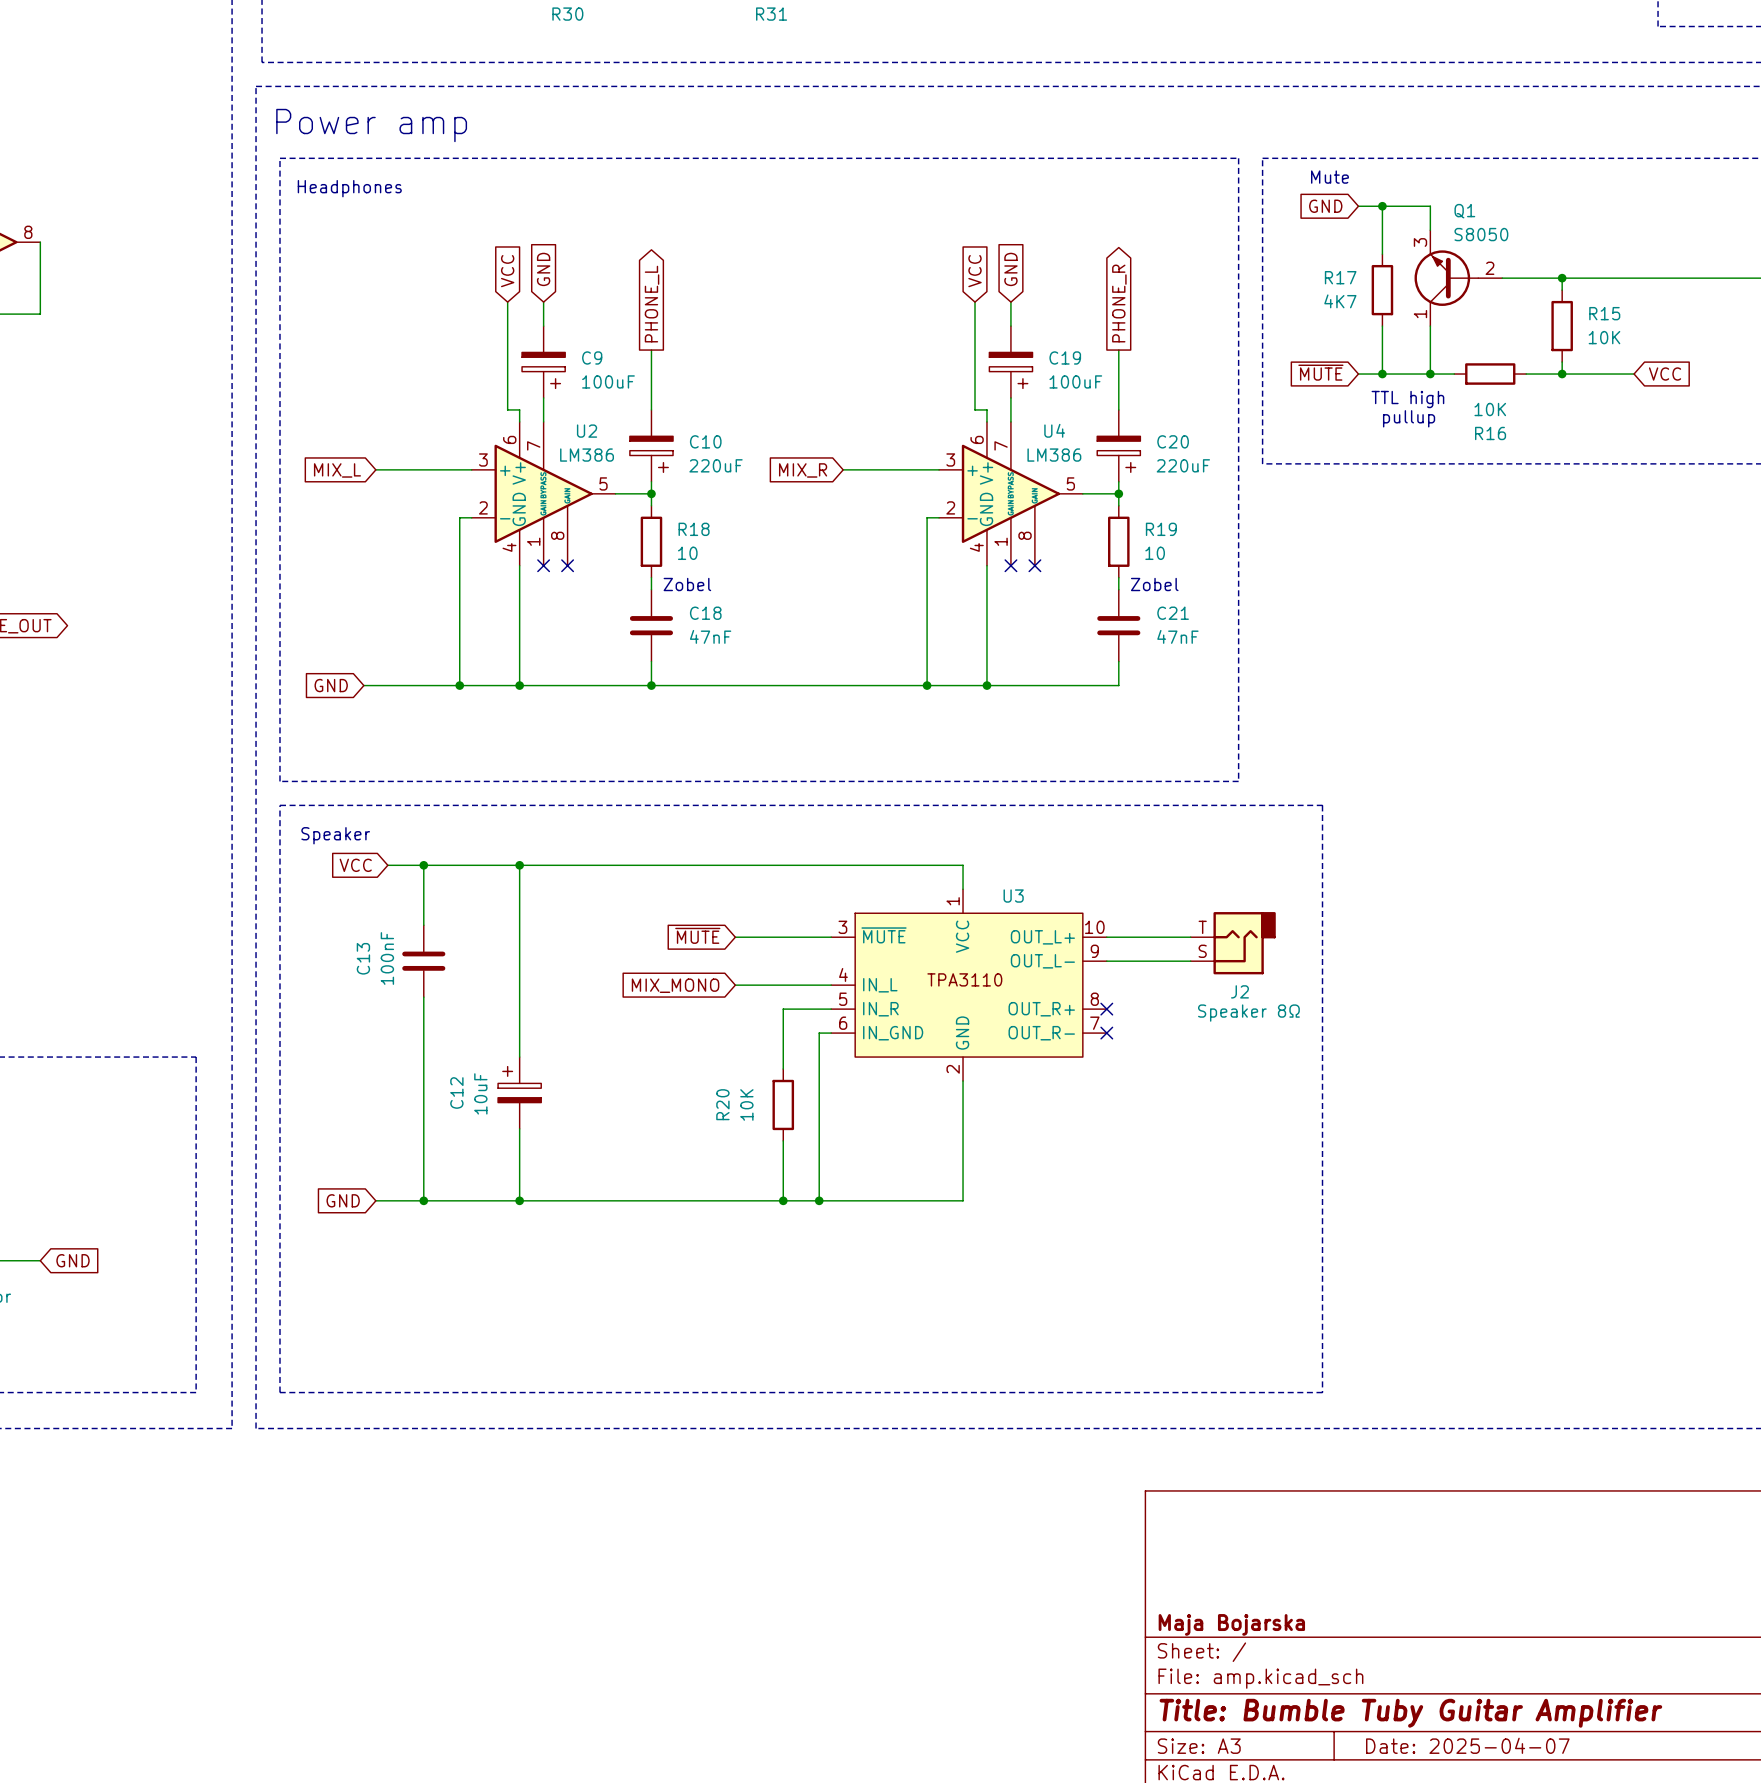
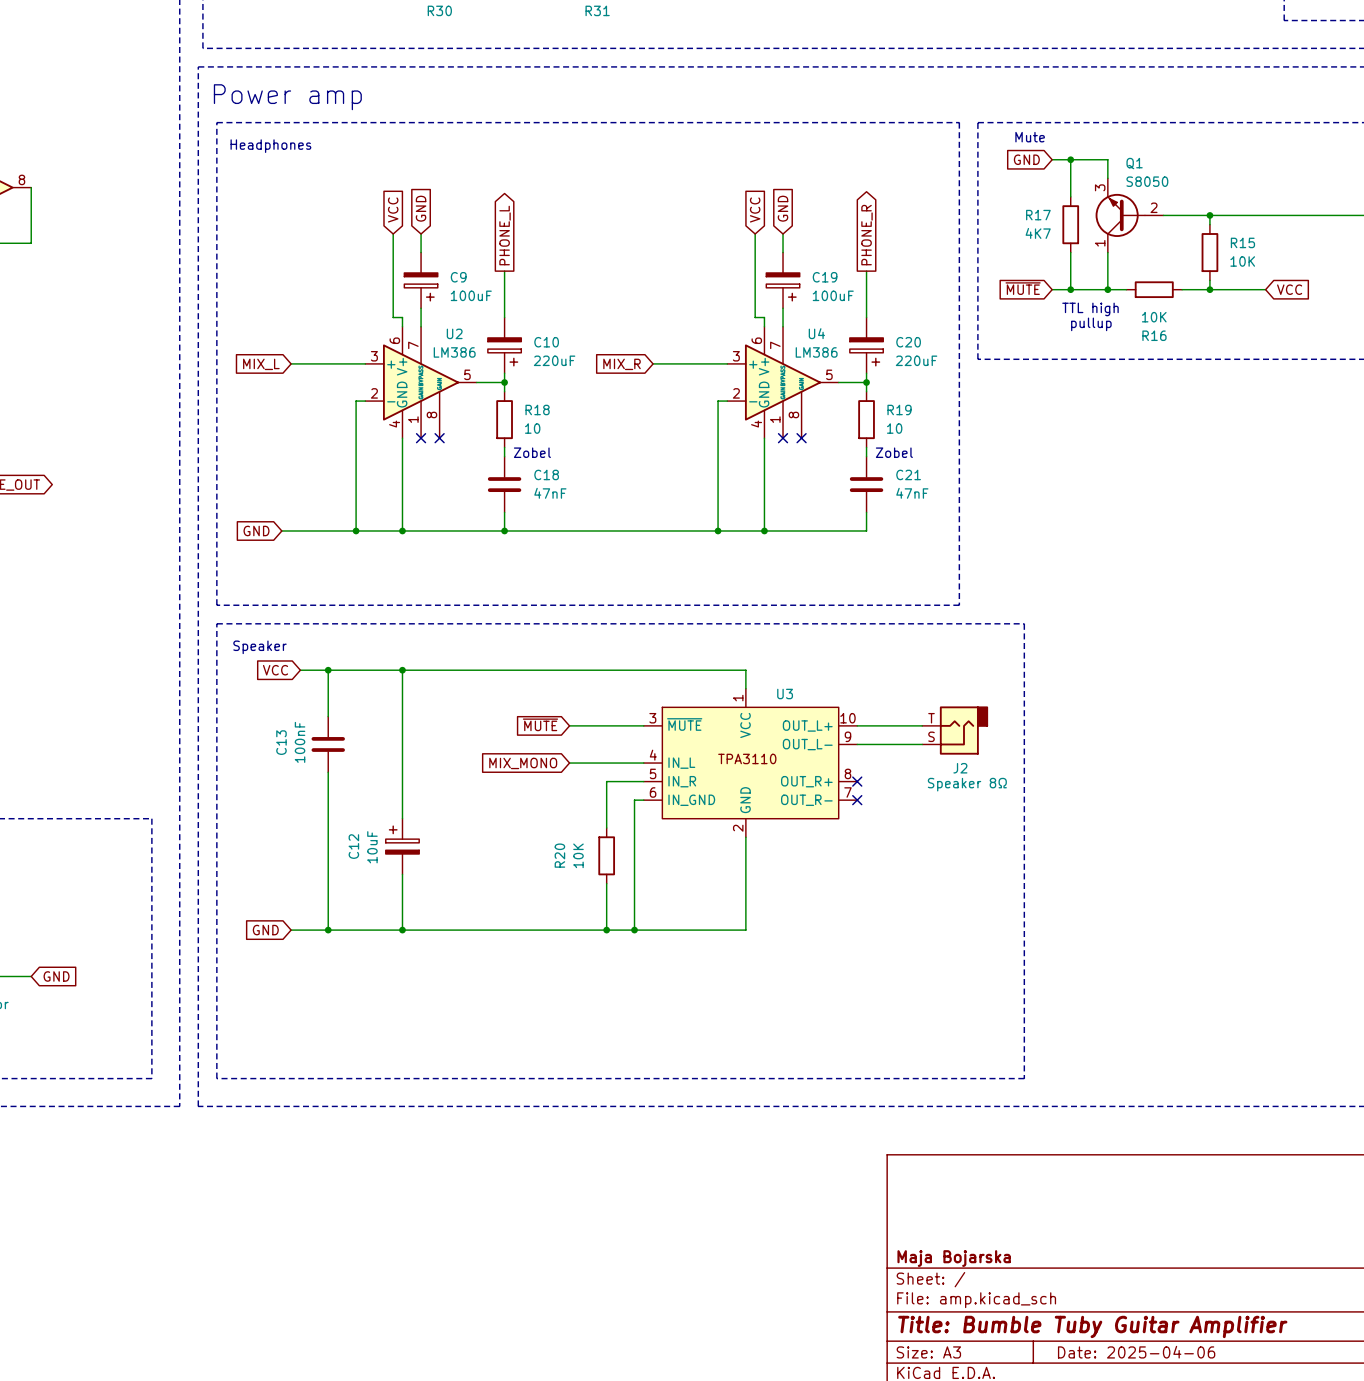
title block: Date: 2025-04-07 (1467, 1745) -> Date: 2025-04-06 (1136, 1352)

